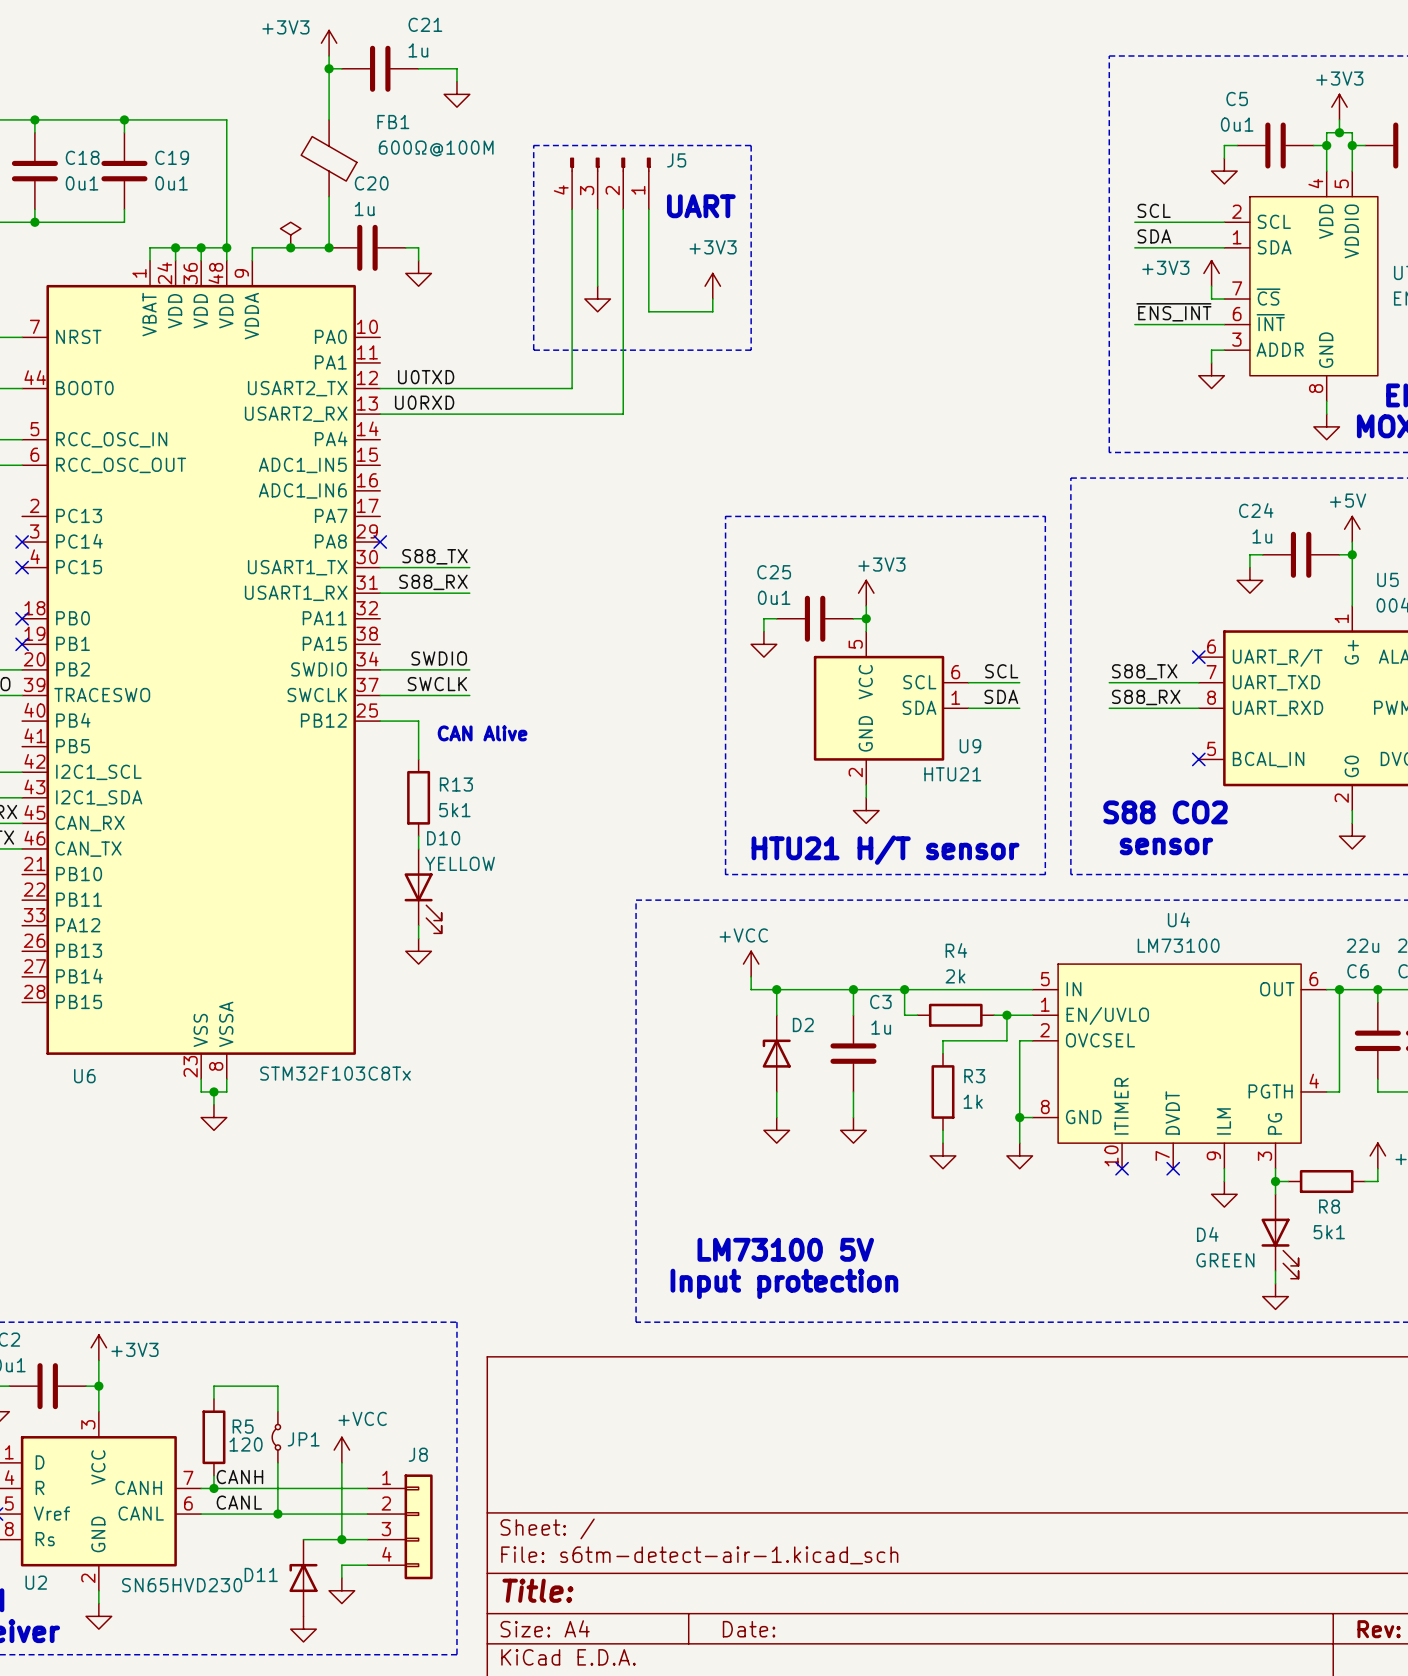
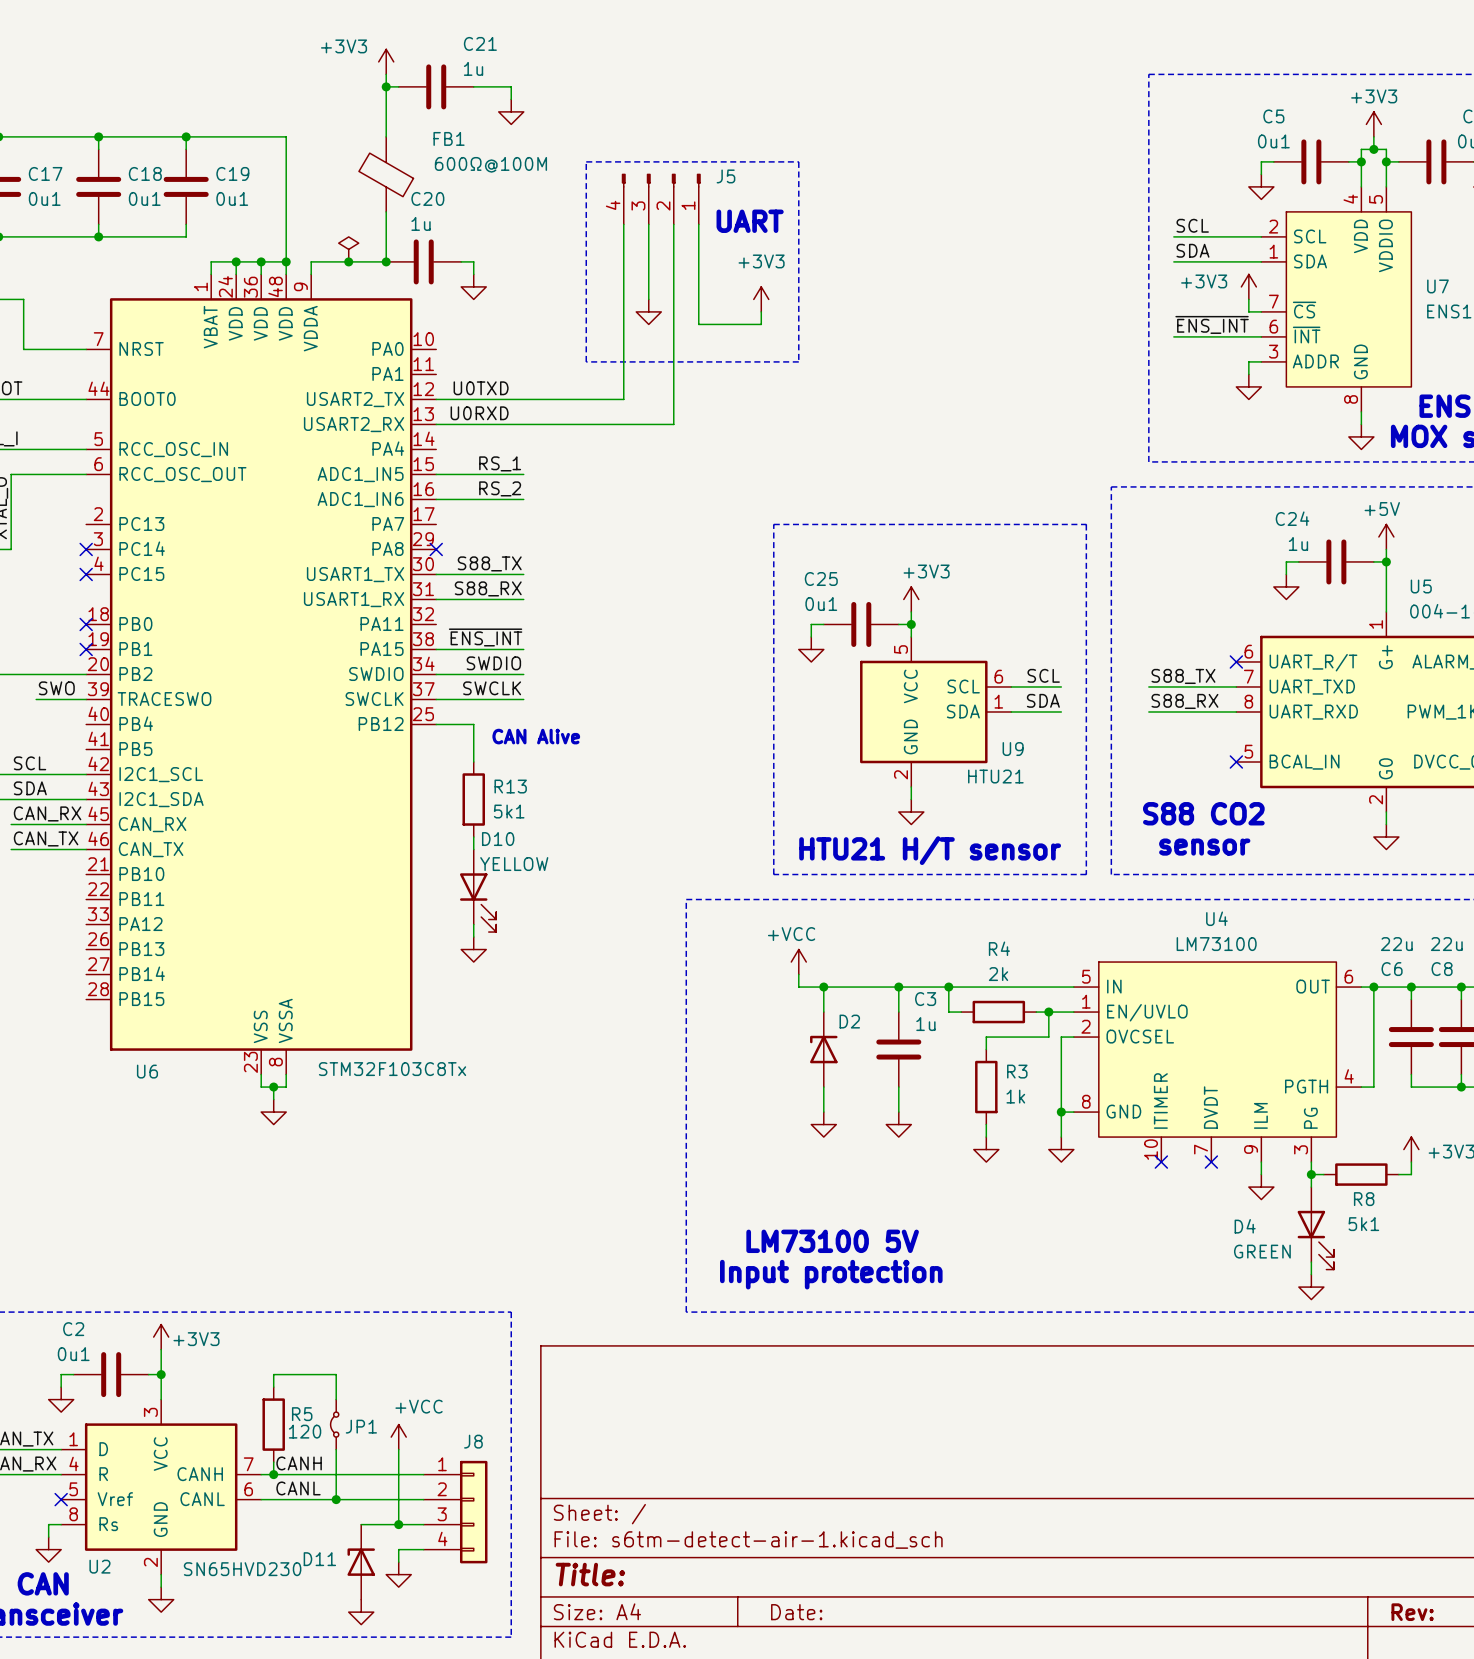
label: none -> RS_1 (500, 463)
wire: none -> (436, 474) (523, 474)
label: none -> RS_2 (500, 488)
wire: none -> (436, 499) (523, 499)
label: none -> ~{ENS_INT} (485, 637)
wire: none -> (436, 649) (523, 649)

